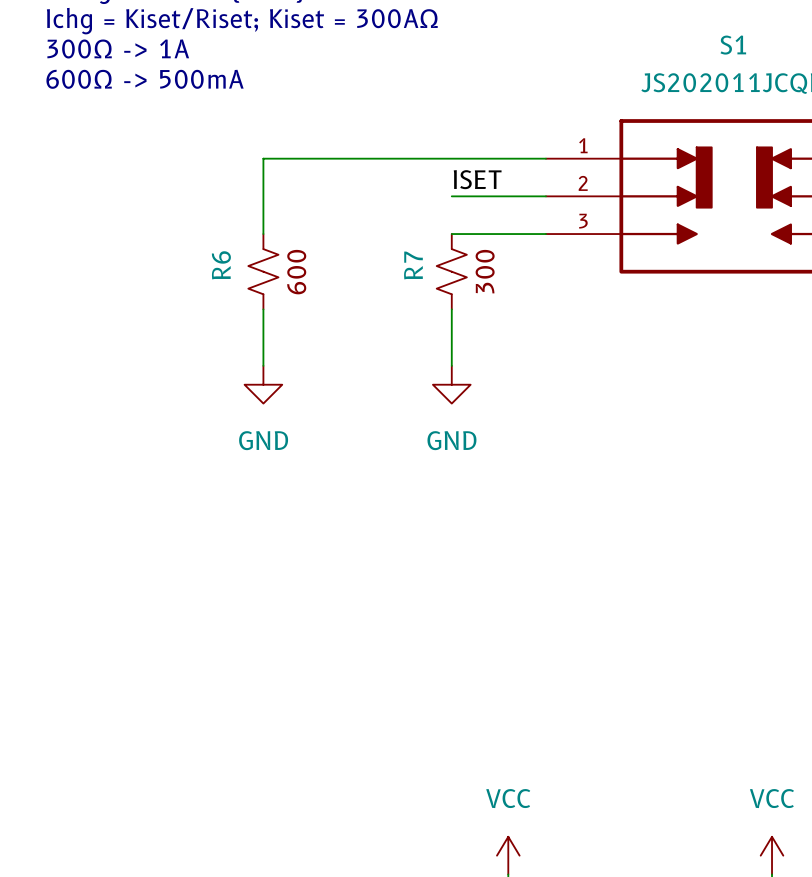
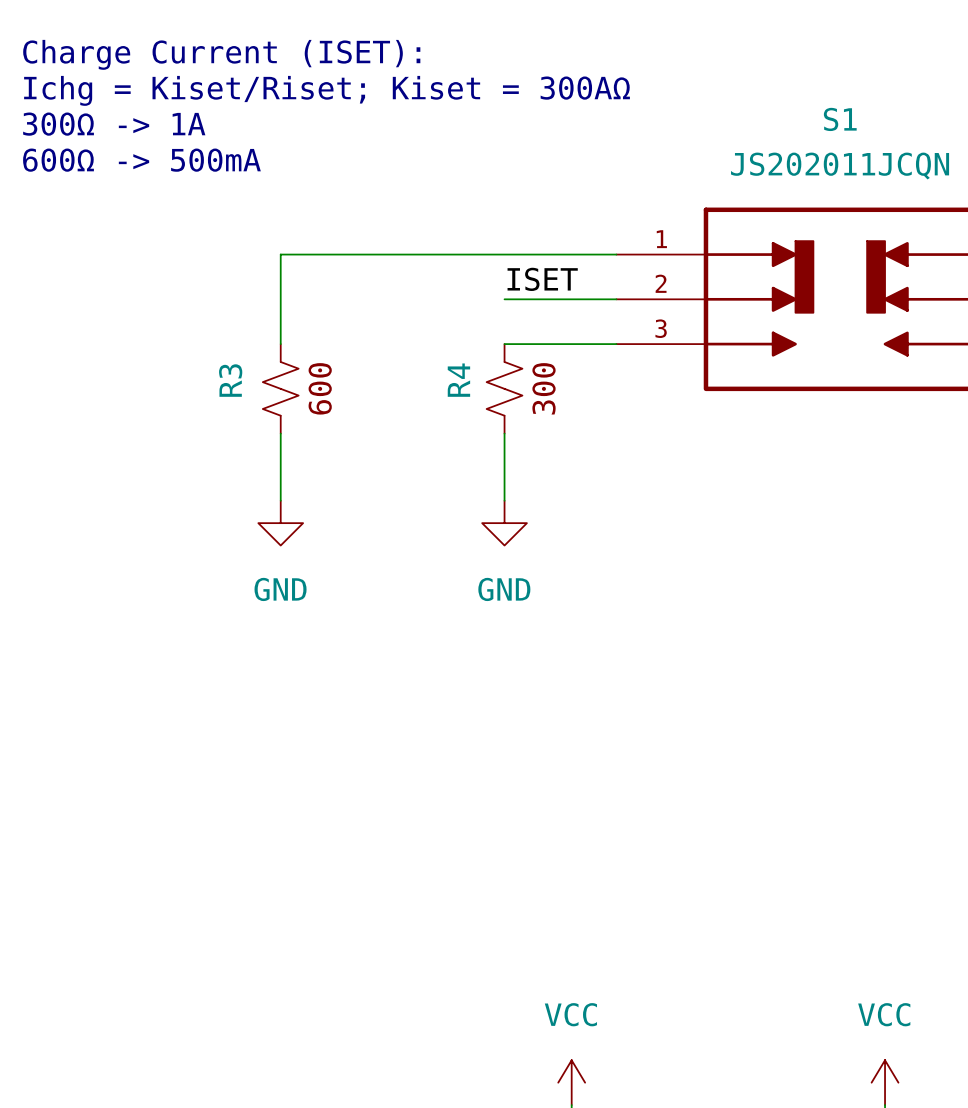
R6 name: R6 (221, 265) -> R3 (230, 380)
R7 name: R7 (413, 265) -> R4 (458, 380)

